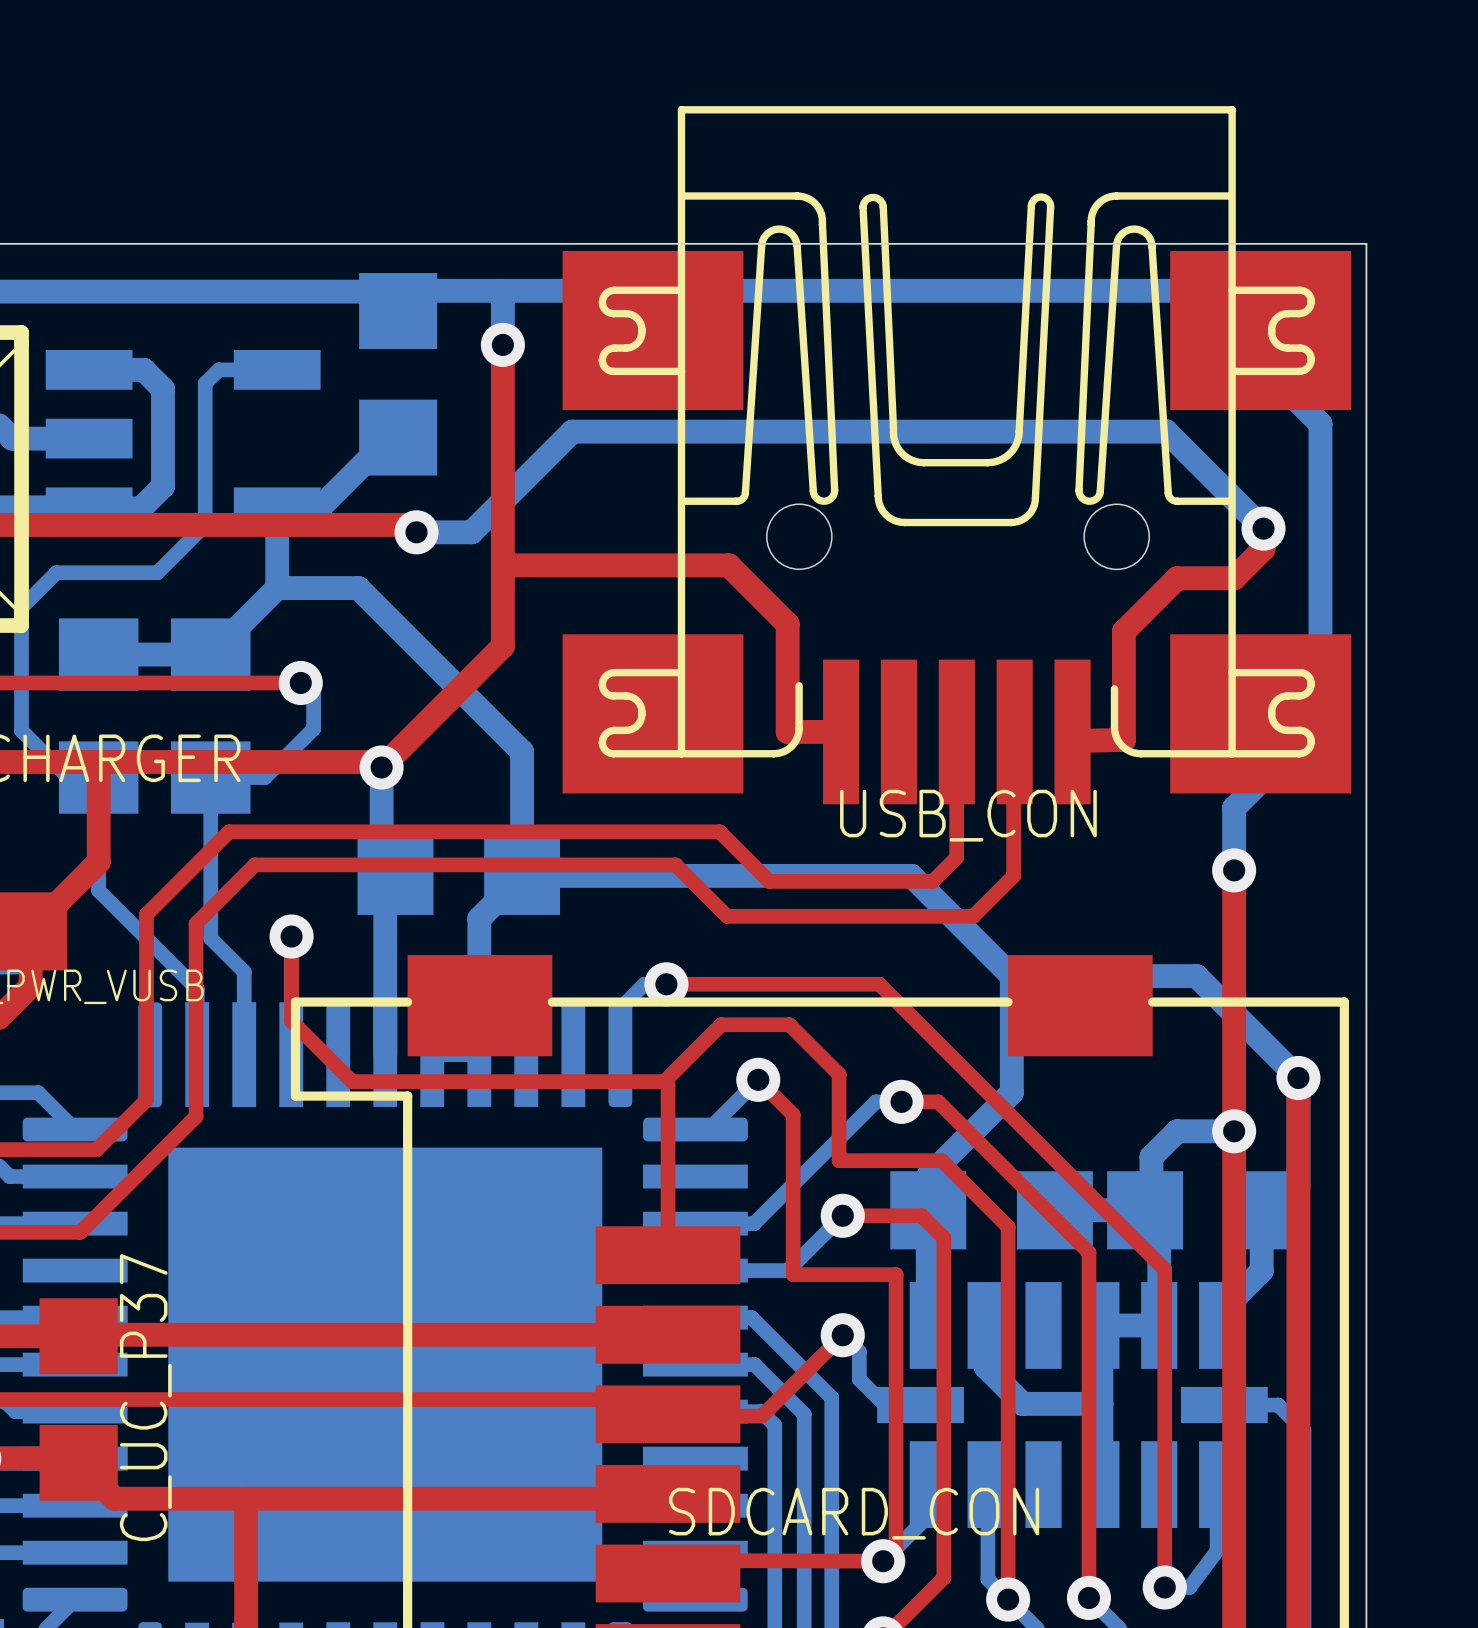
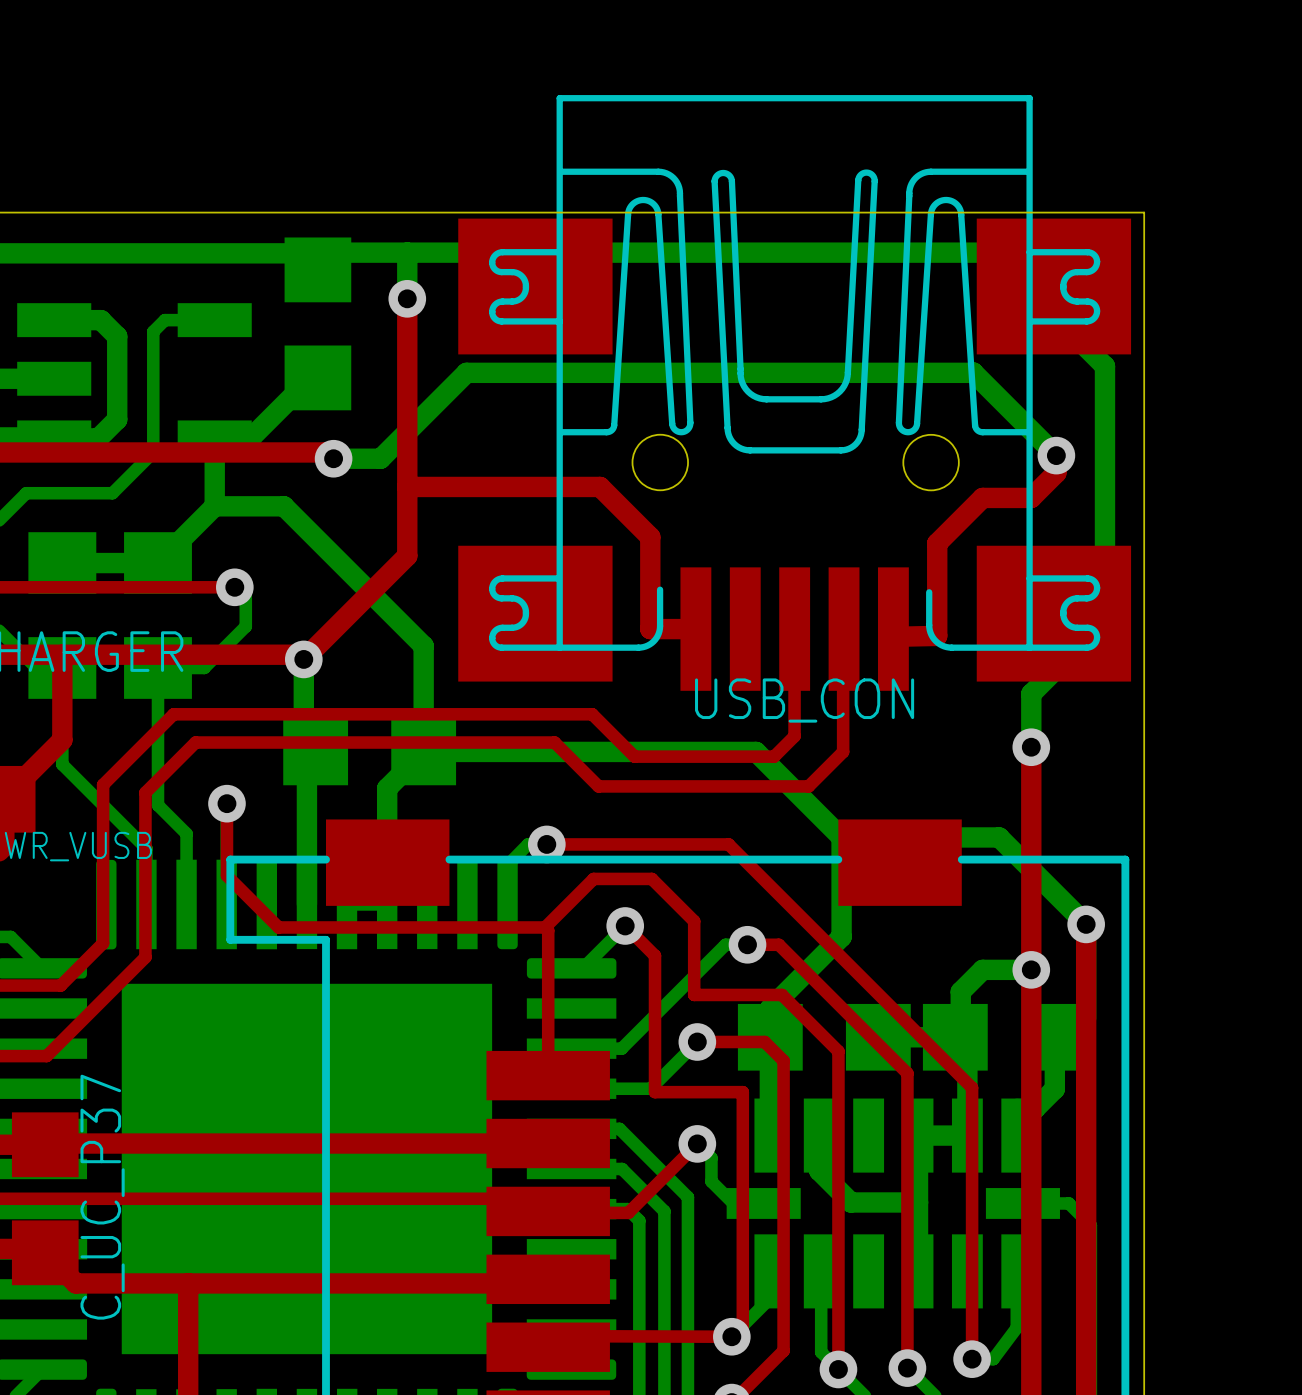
text: SDCARD_CON (854, 1513) -> none

